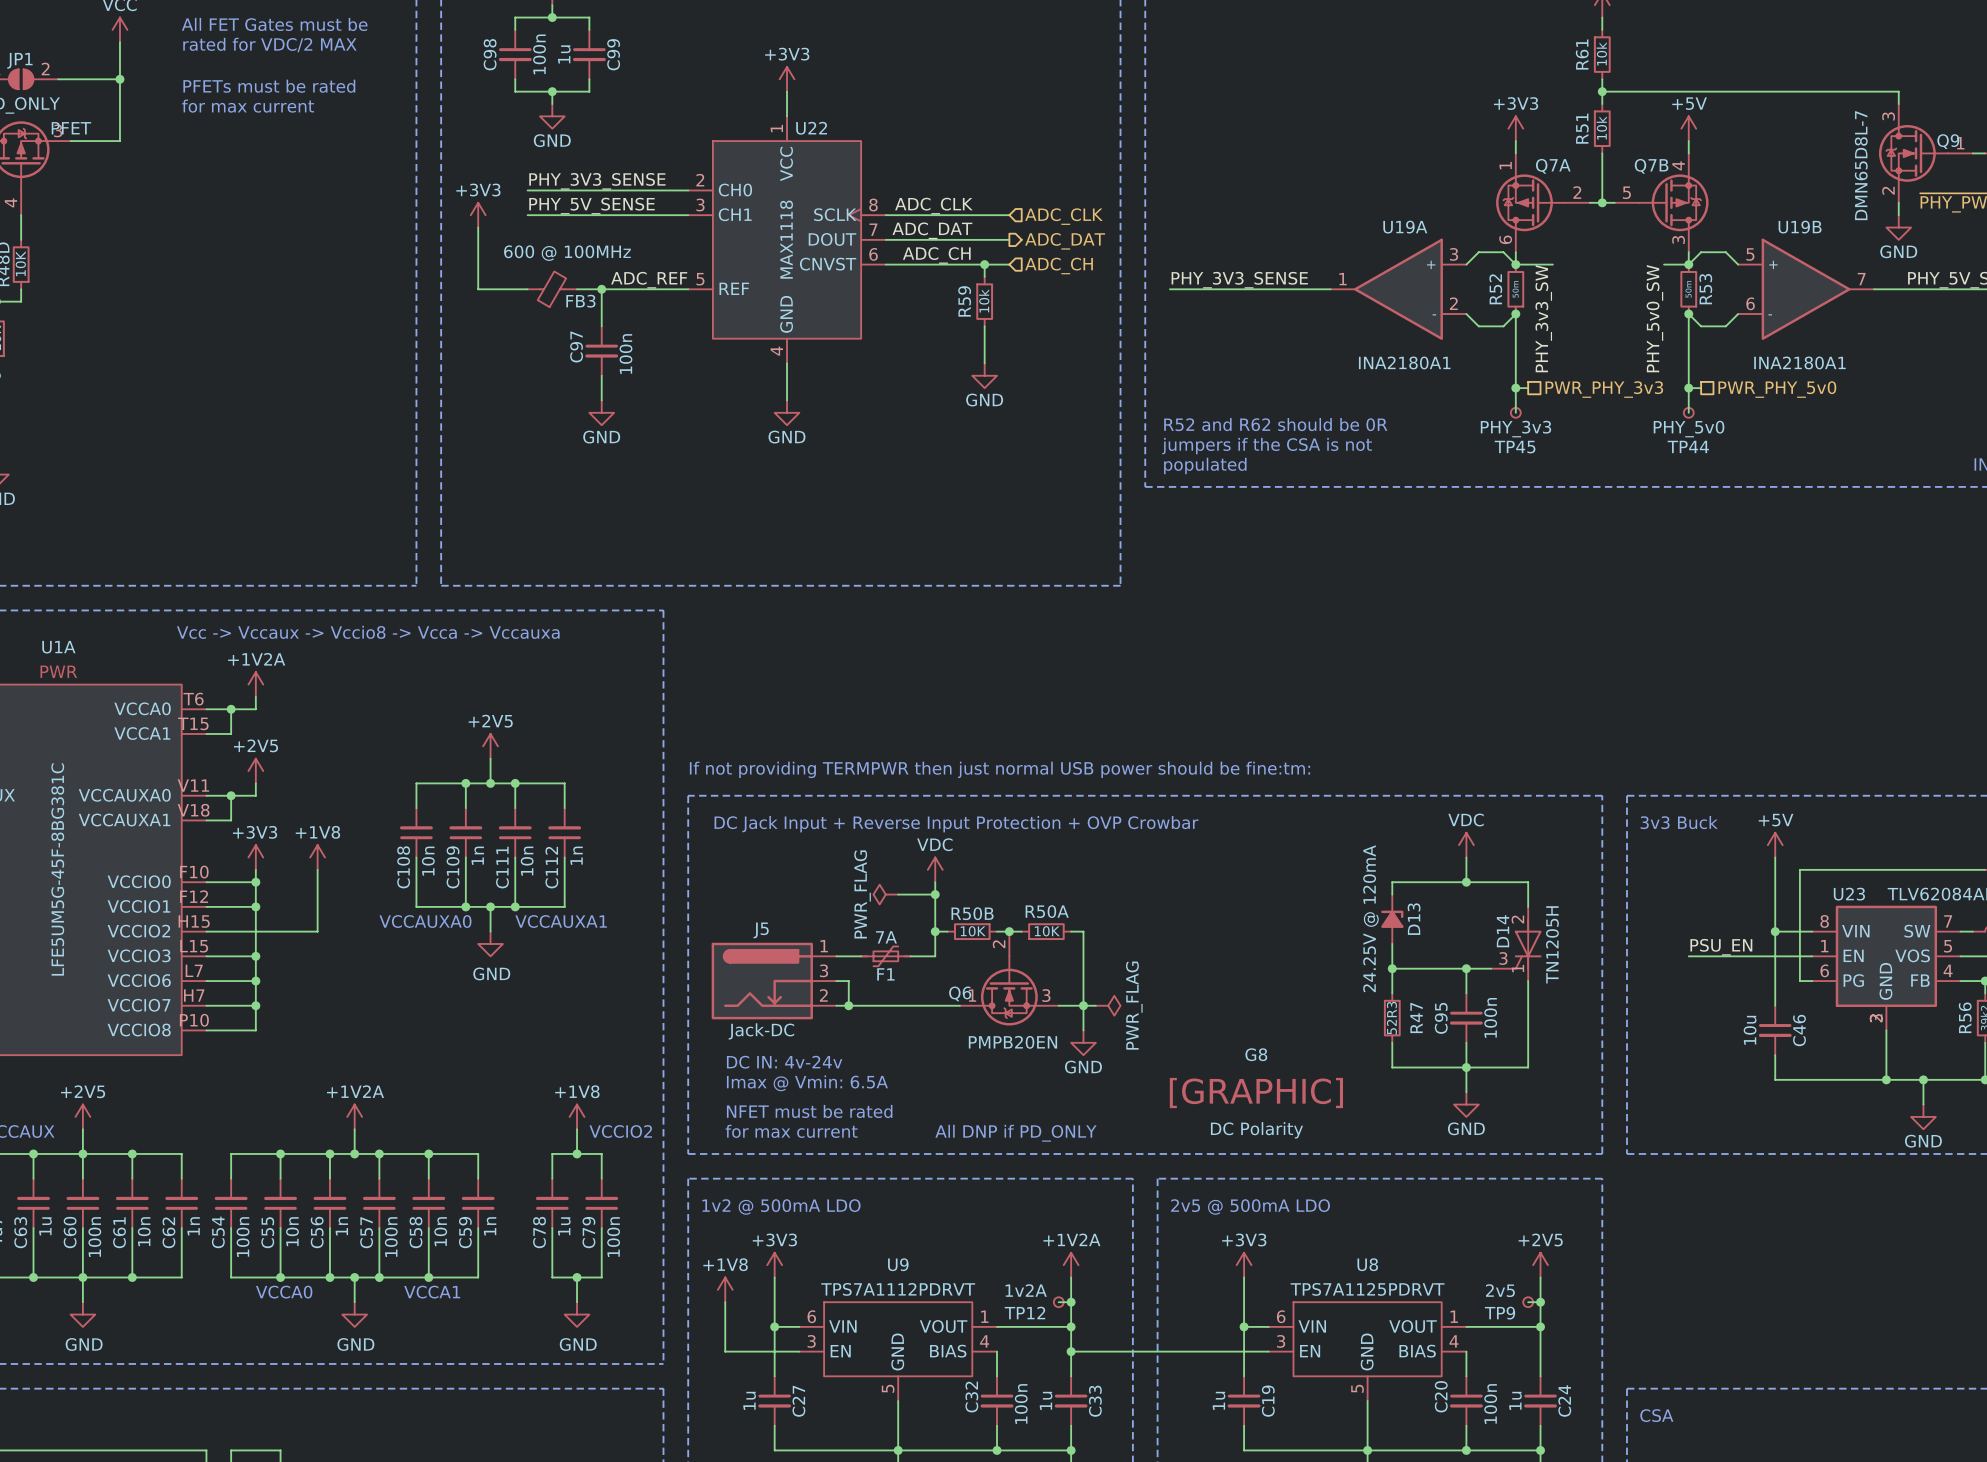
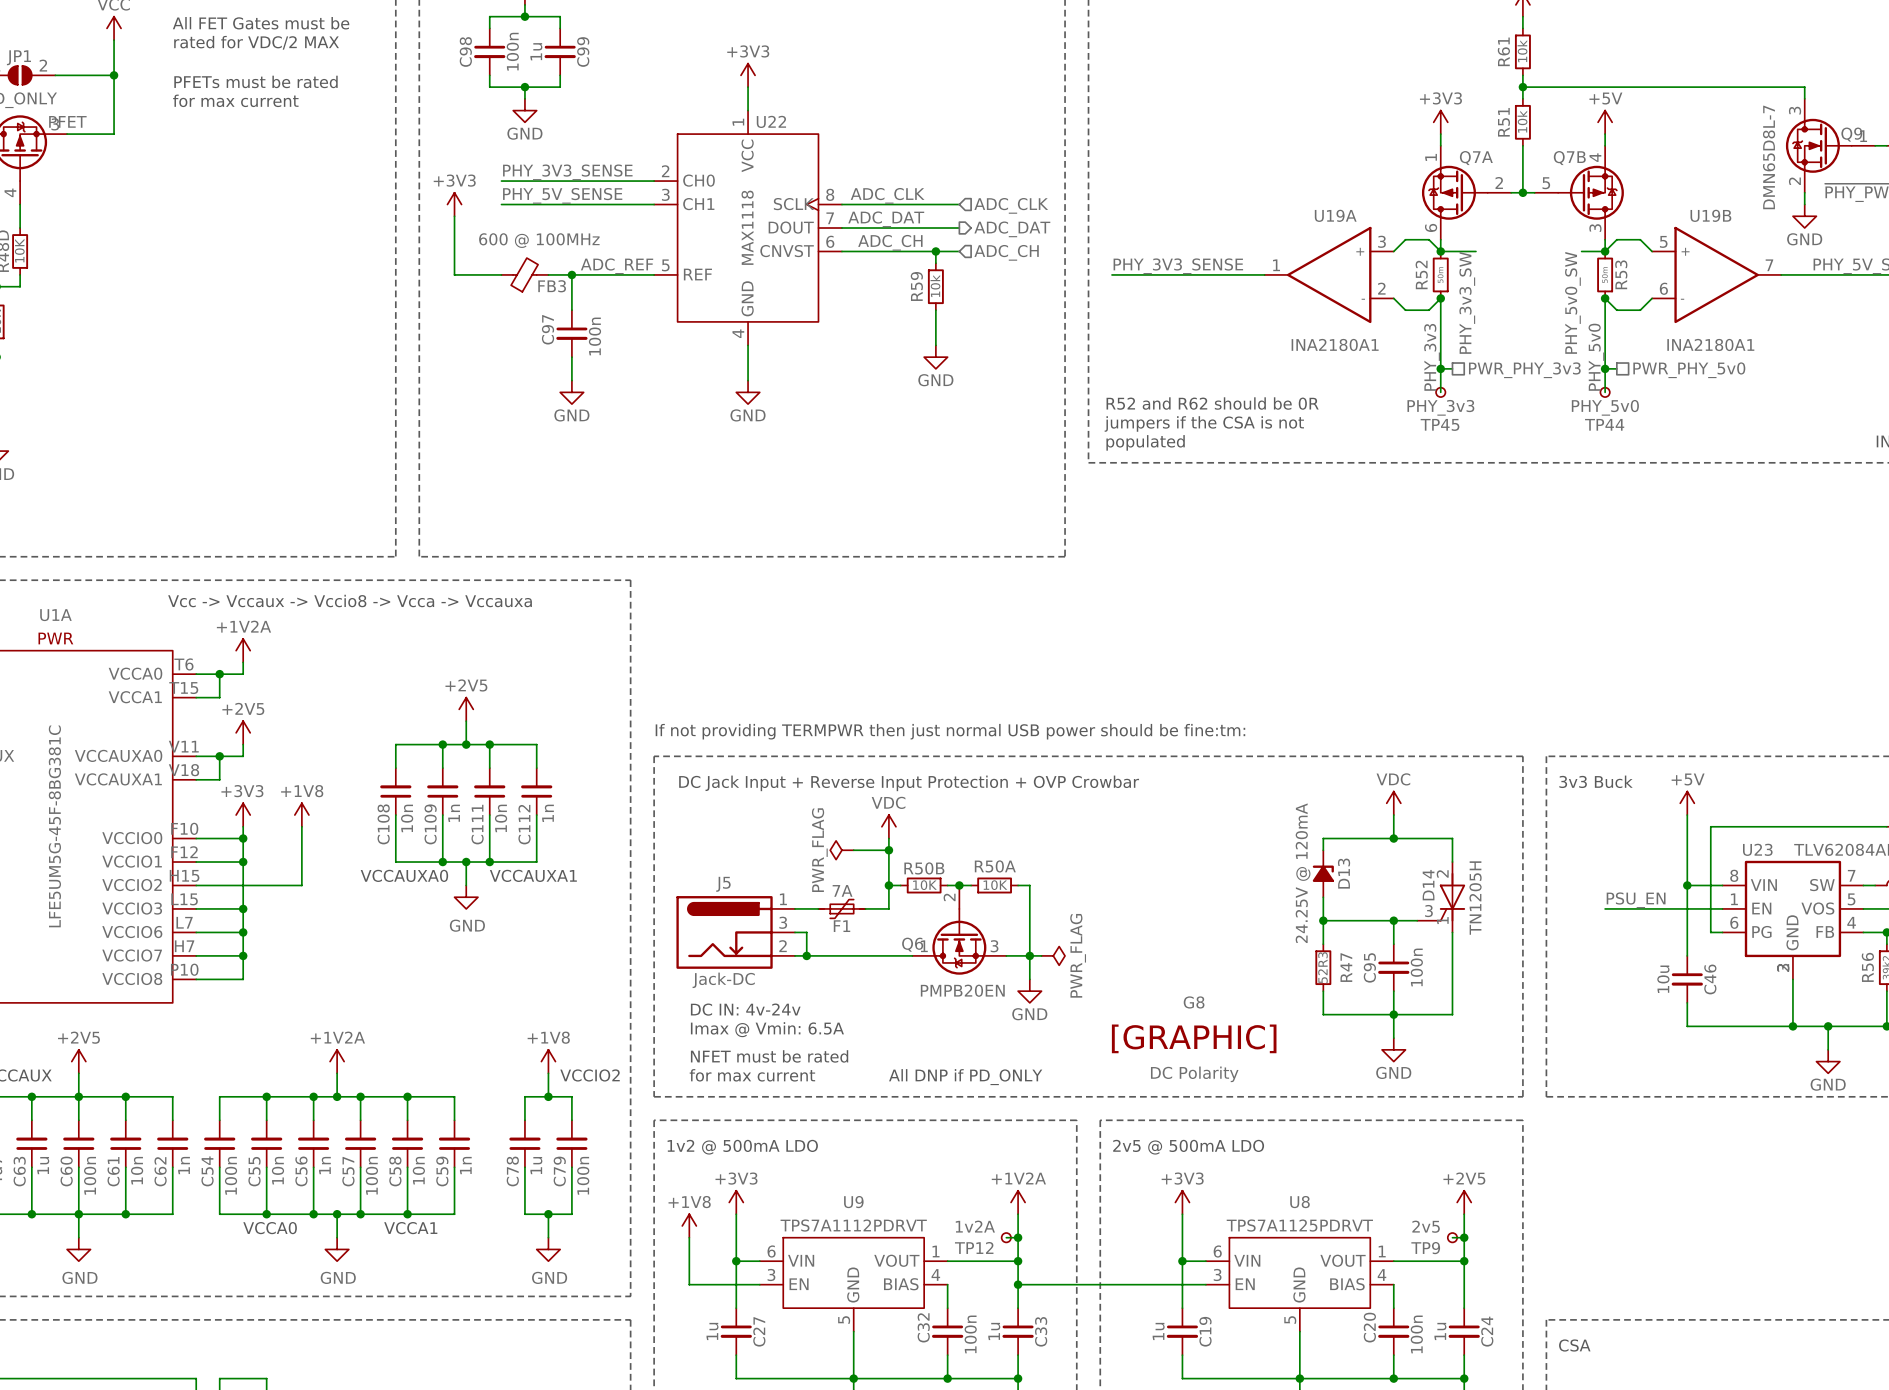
label: none -> PHY_3v3 (1432, 357)
label: none -> PHY_5v0 (1596, 357)

